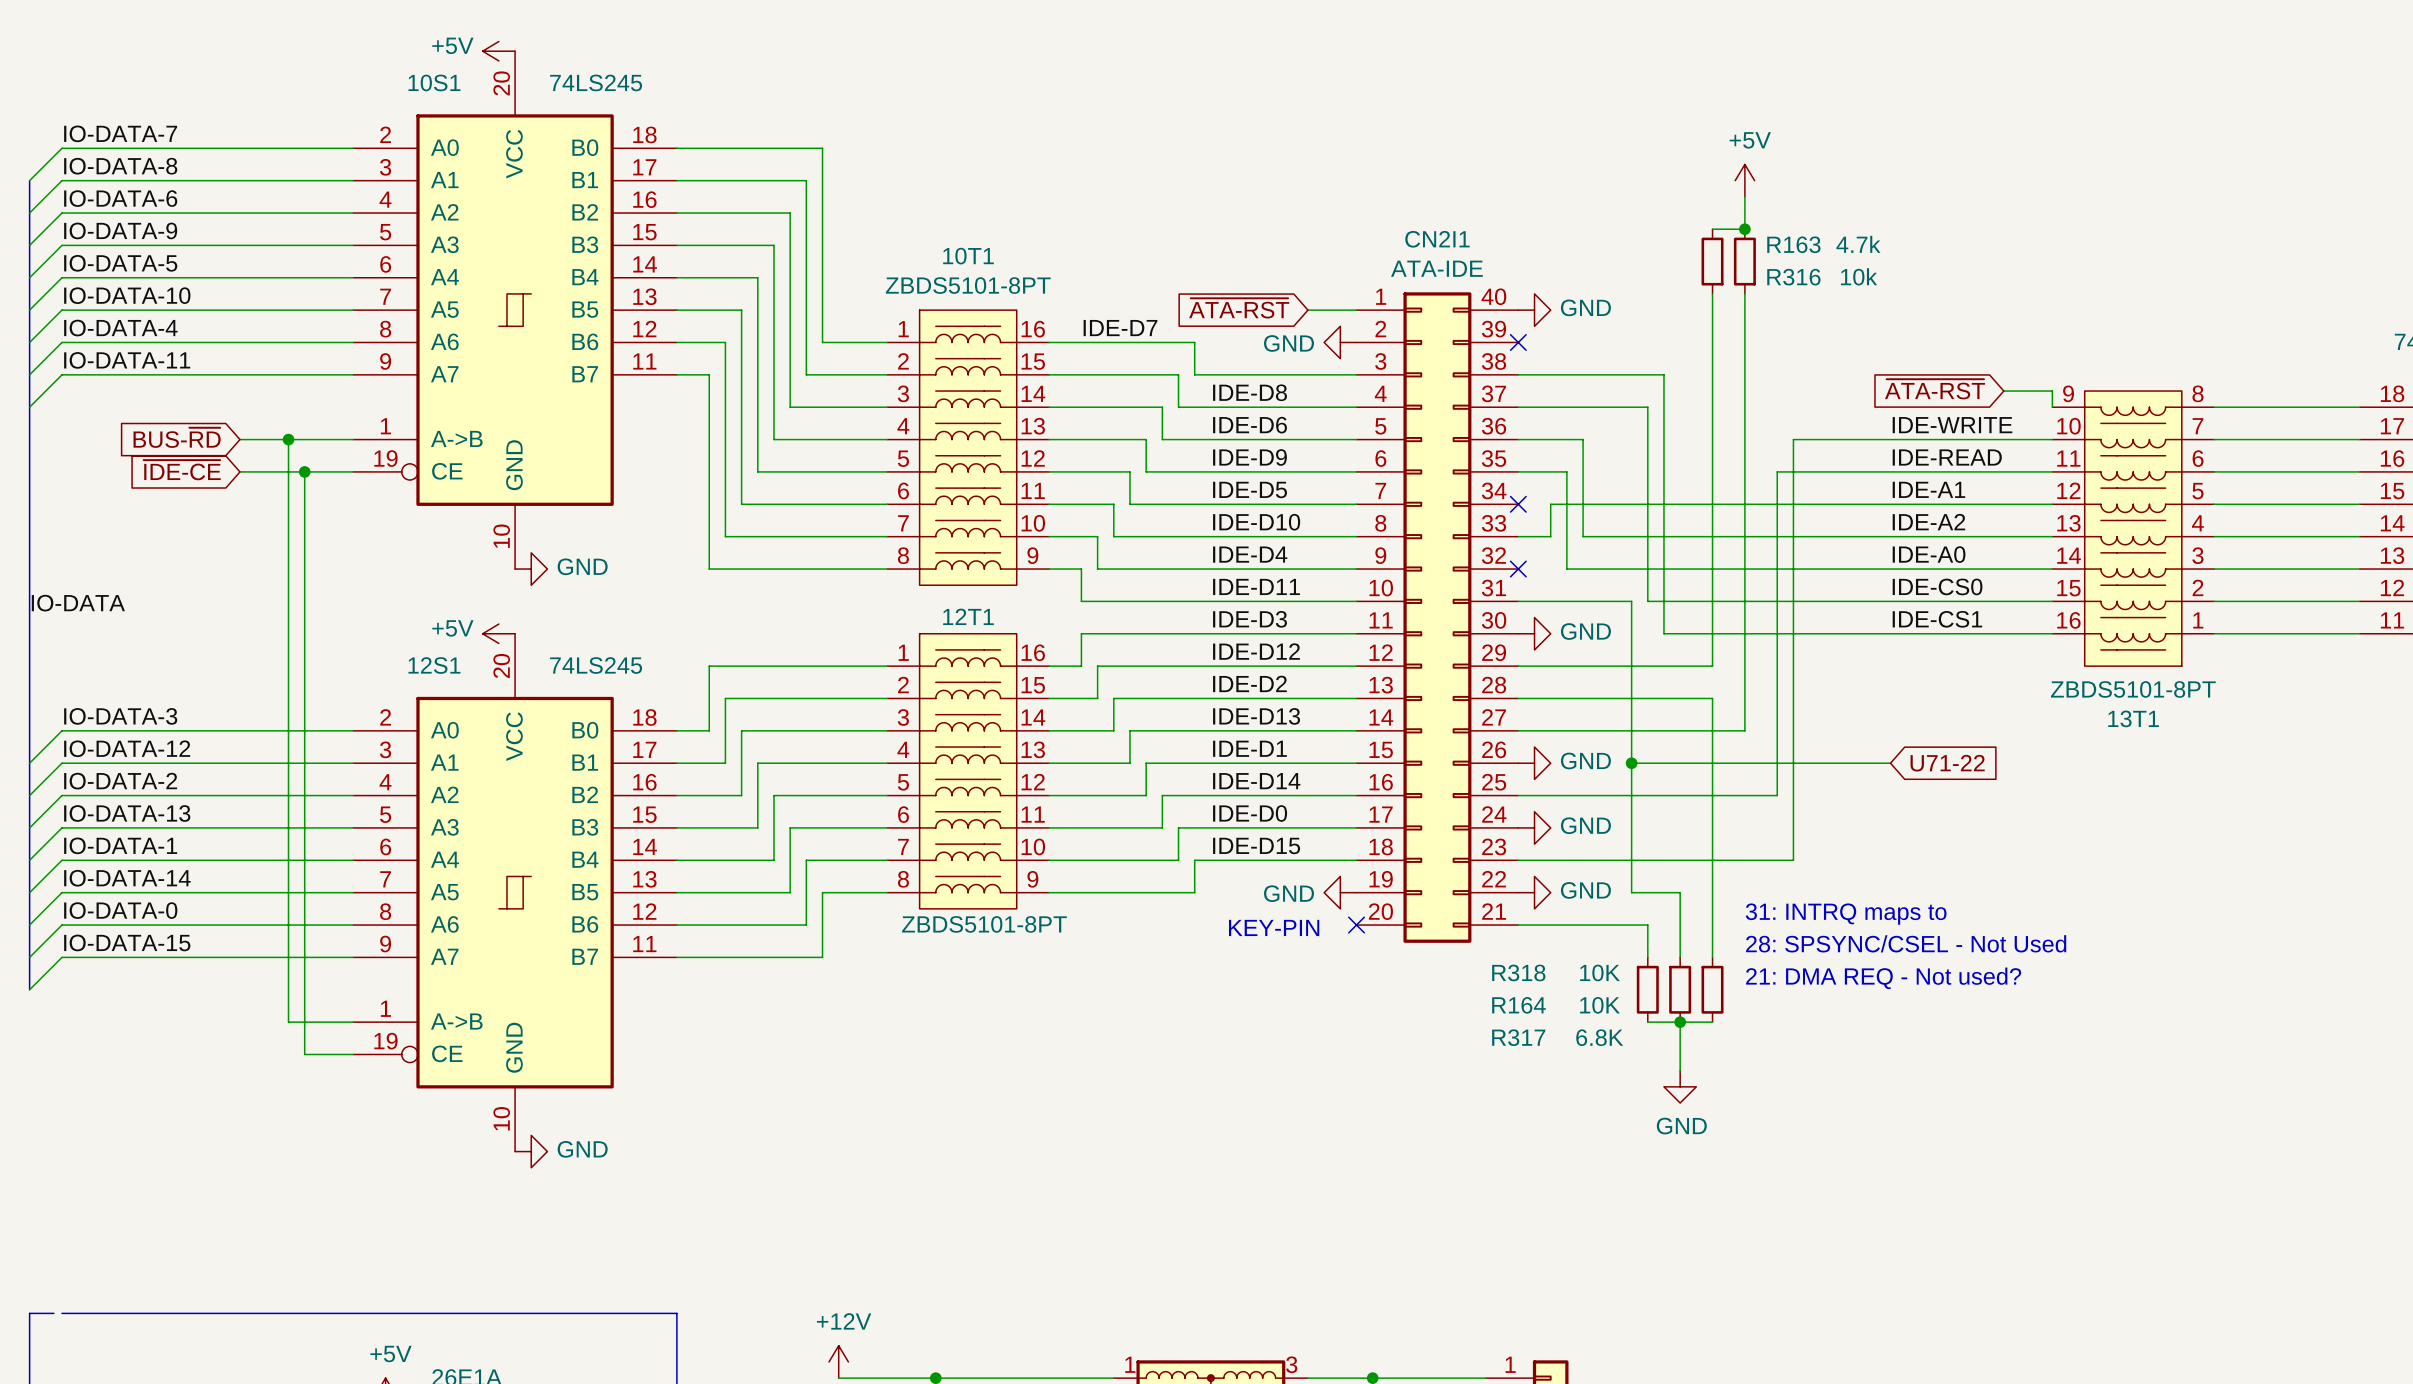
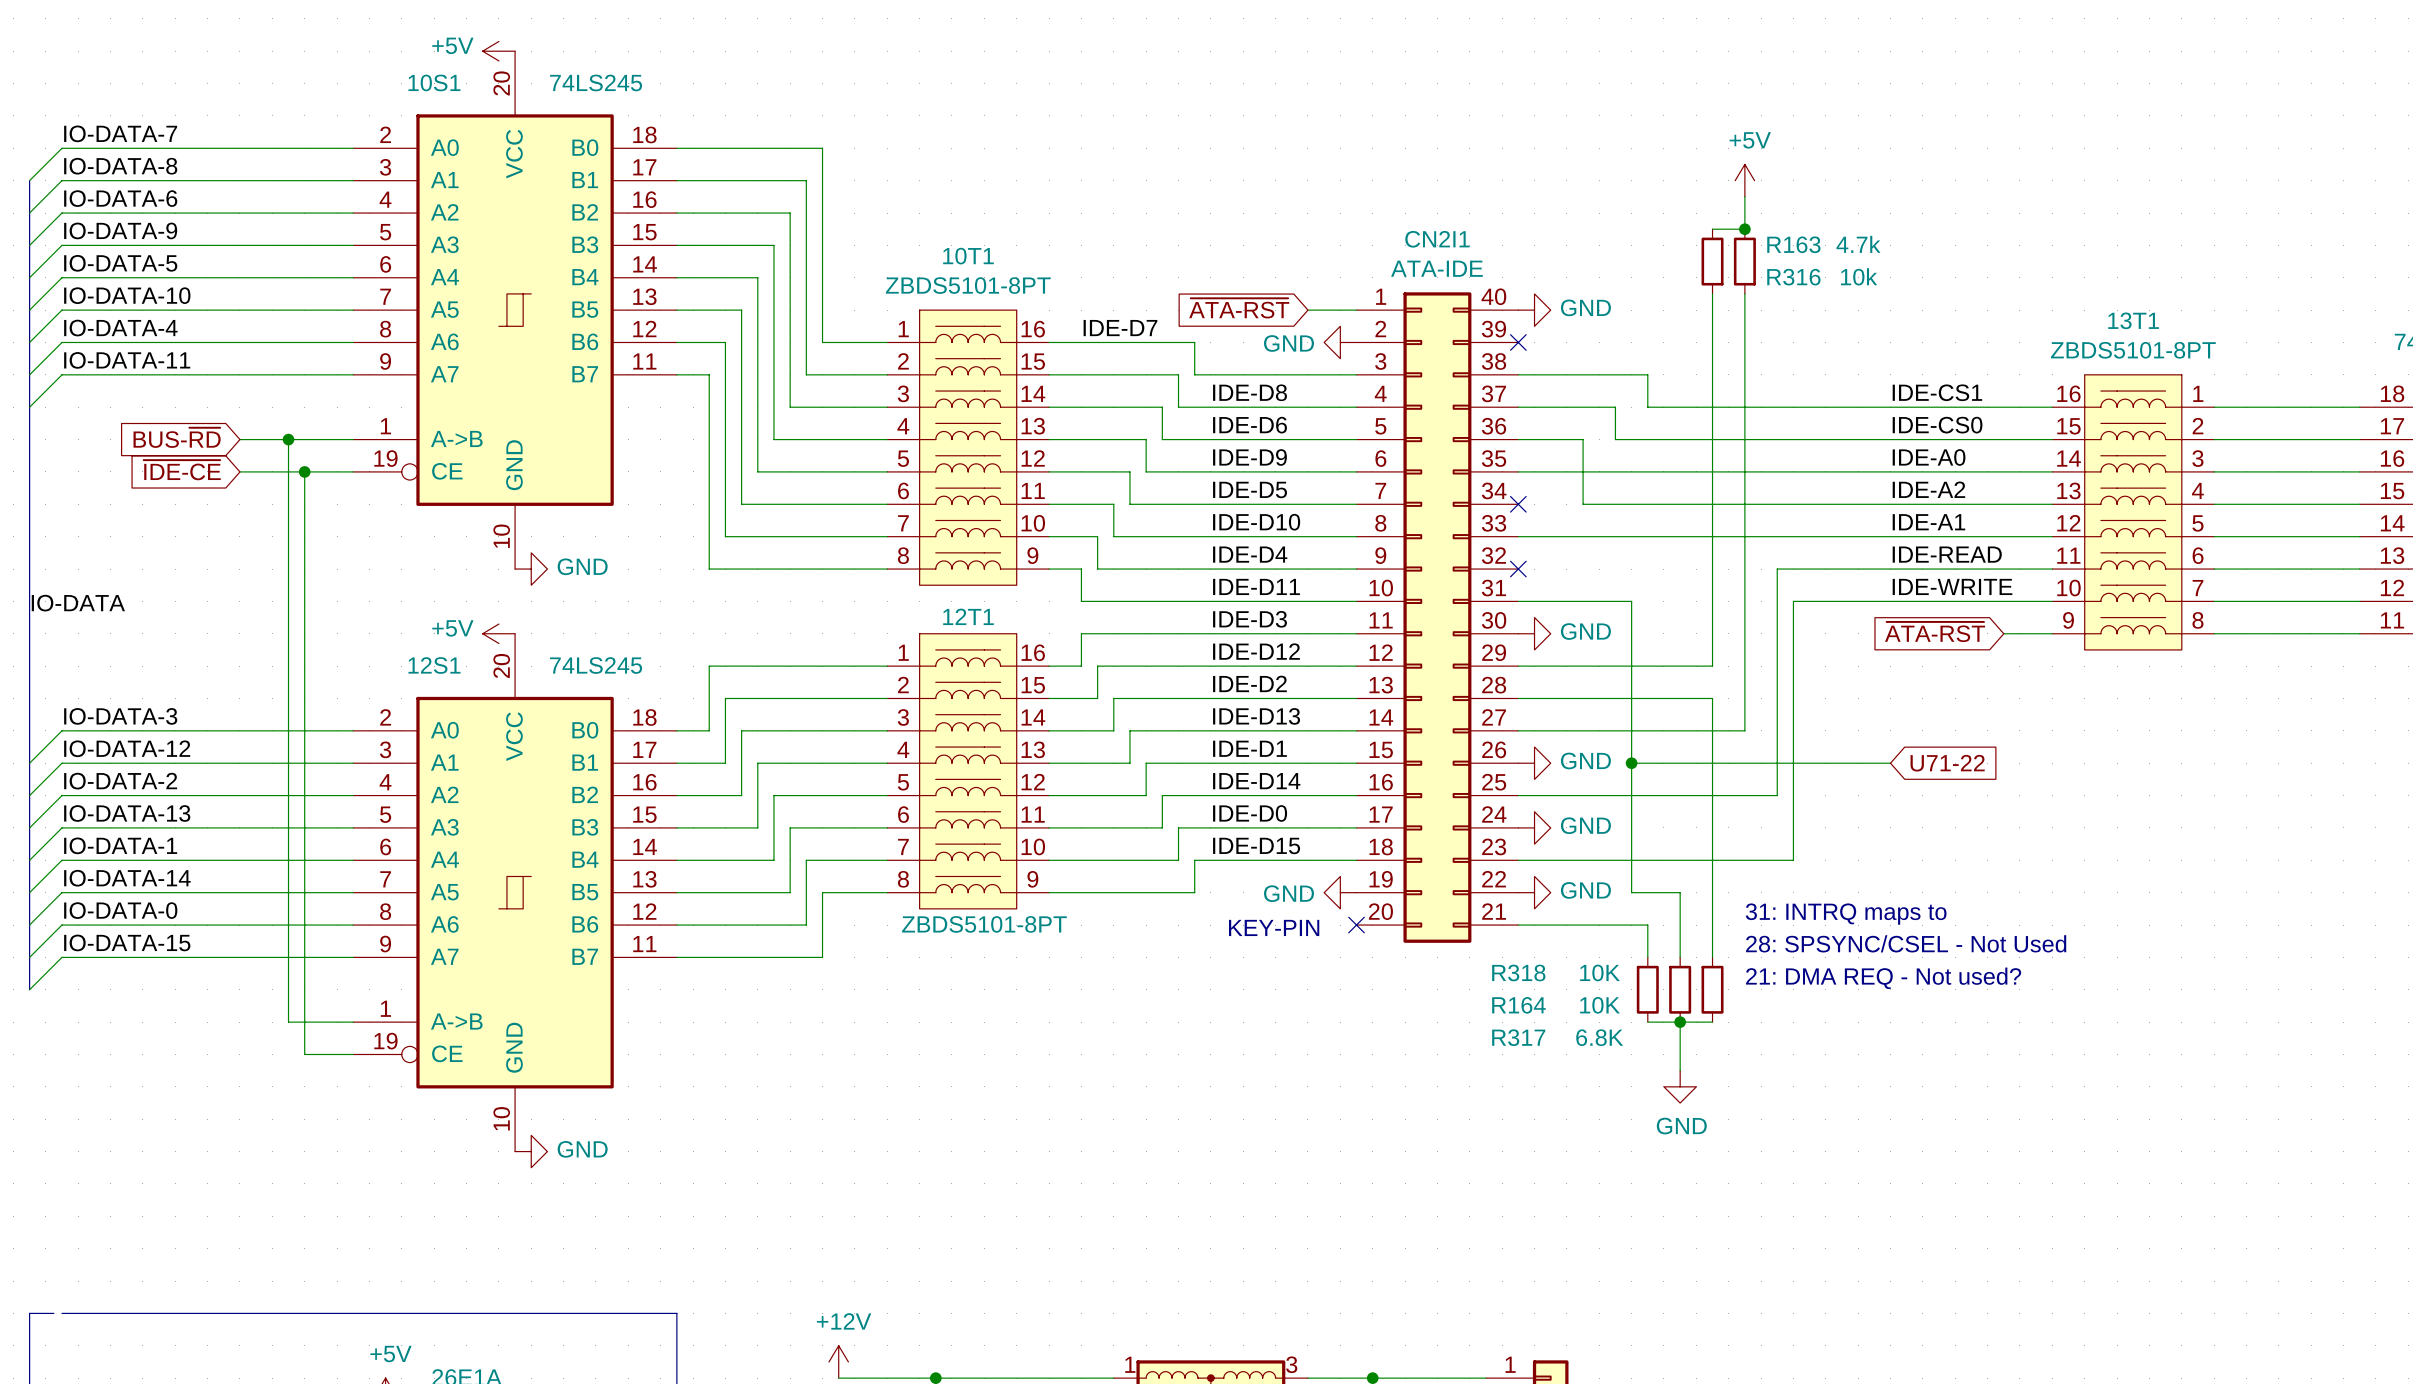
wire: (1647, 374) (1663, 374) (1663, 633) (2003, 633) -> (1647, 374) (1647, 407) (2052, 407)
global label position: ~{ATA-RST} (1935, 389) -> ~{ATA-RST} (1935, 632)
wire: (2003, 391) (2052, 391) (2052, 407) -> none
13T1 symbol: [2052, 391, 2215, 667] -> [2052, 374, 2215, 650]
wire: (1615, 407) (1647, 407) (1647, 601) (1793, 601) (1793, 439) -> (1615, 407) (1615, 439) (1793, 439)
label: IDE-WRITE (1952, 425) -> IDE-CS0 (1937, 425)
label: IDE-READ (1947, 457) -> IDE-A0 (1929, 457)
wire: (1566, 471) (1566, 569) (1777, 569) (1777, 471) -> (1566, 471) (1777, 471)
label: IDE-A1 (1928, 489) -> IDE-A2 (1928, 489)
label: IDE-A2 (1928, 522) -> IDE-A1 (1928, 522)
wire: (1550, 536) (1550, 504) (1583, 504) (1583, 536) -> (1550, 536) (1583, 536)
label: IDE-A0 (1929, 554) -> IDE-READ (1947, 554)
label: IDE-CS0 (1937, 586) -> IDE-WRITE (1952, 586)
label position: IDE-CS1 (1937, 619) -> IDE-CS1 (1937, 392)
13T1 value position: ZBDS5101-8PT (2133, 689) -> ZBDS5101-8PT (2133, 350)
13T1 name position: 13T1 (2133, 718) -> 13T1 (2133, 320)

